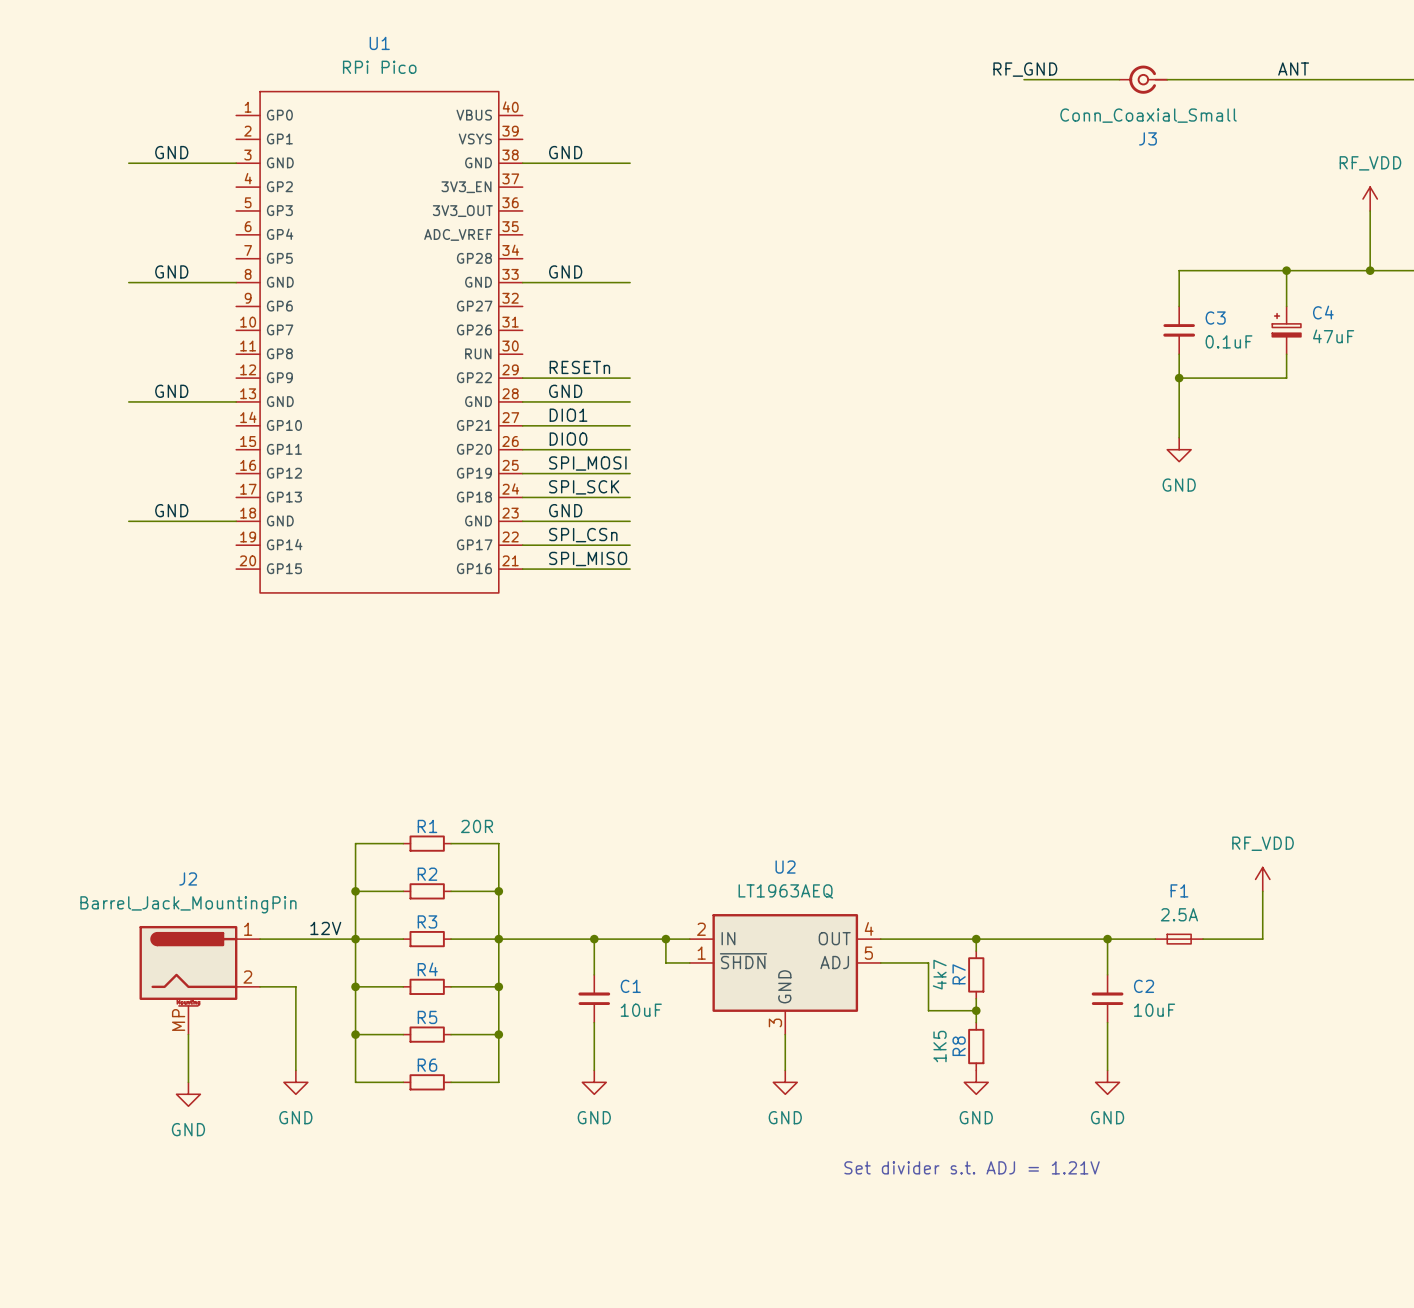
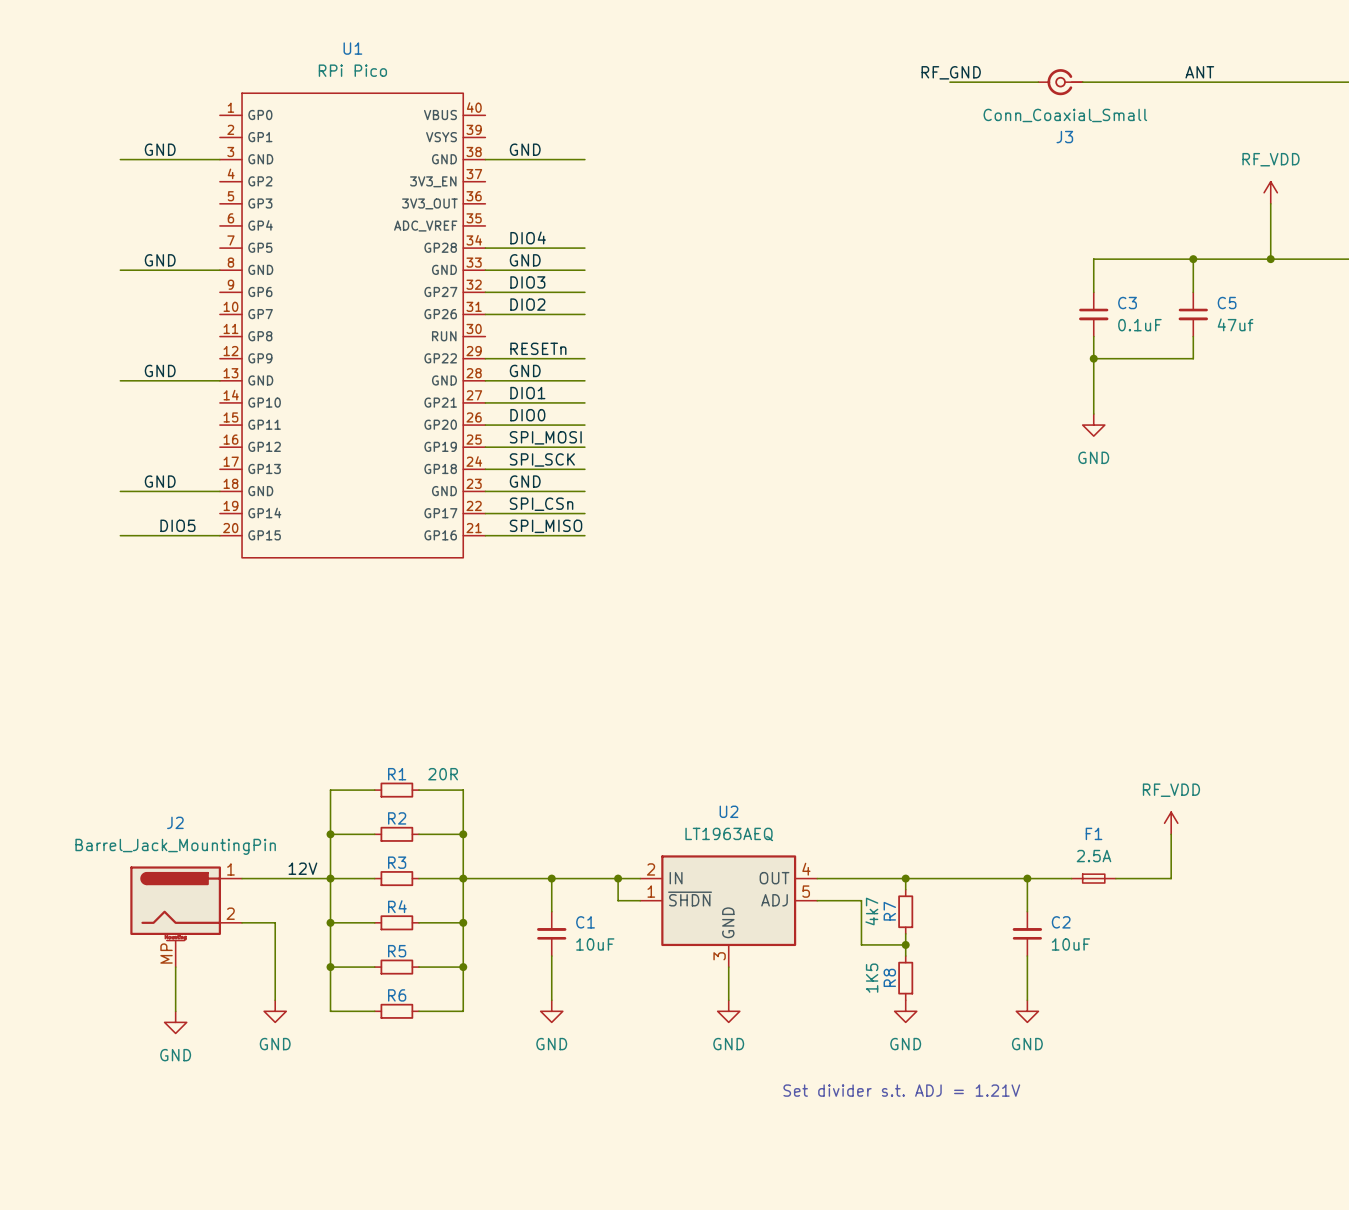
label: none -> DIO4 (528, 237)
wire: none -> (485, 248) (584, 248)
label: none -> DIO3 (527, 282)
wire: none -> (485, 292) (584, 292)
label: none -> DIO2 (527, 304)
wire: none -> (485, 314) (584, 314)
C4: 47uF (1286, 330) -> none
C5: none -> 47uf (1193, 314)
label: none -> DIO5 (177, 525)
wire: none -> (120, 535) (219, 535)

